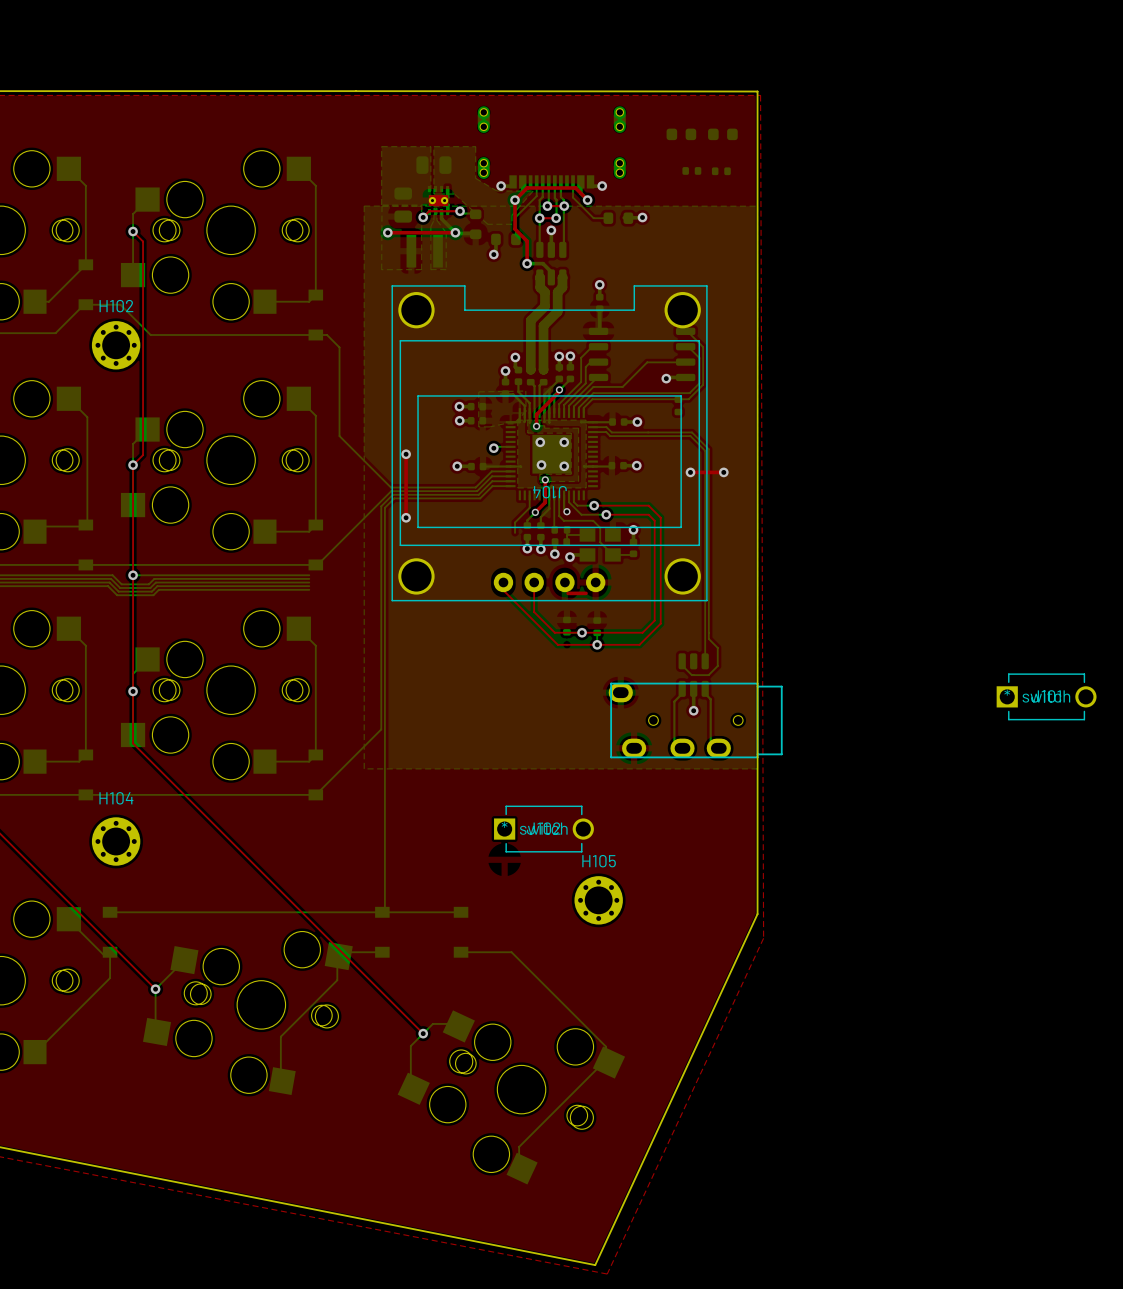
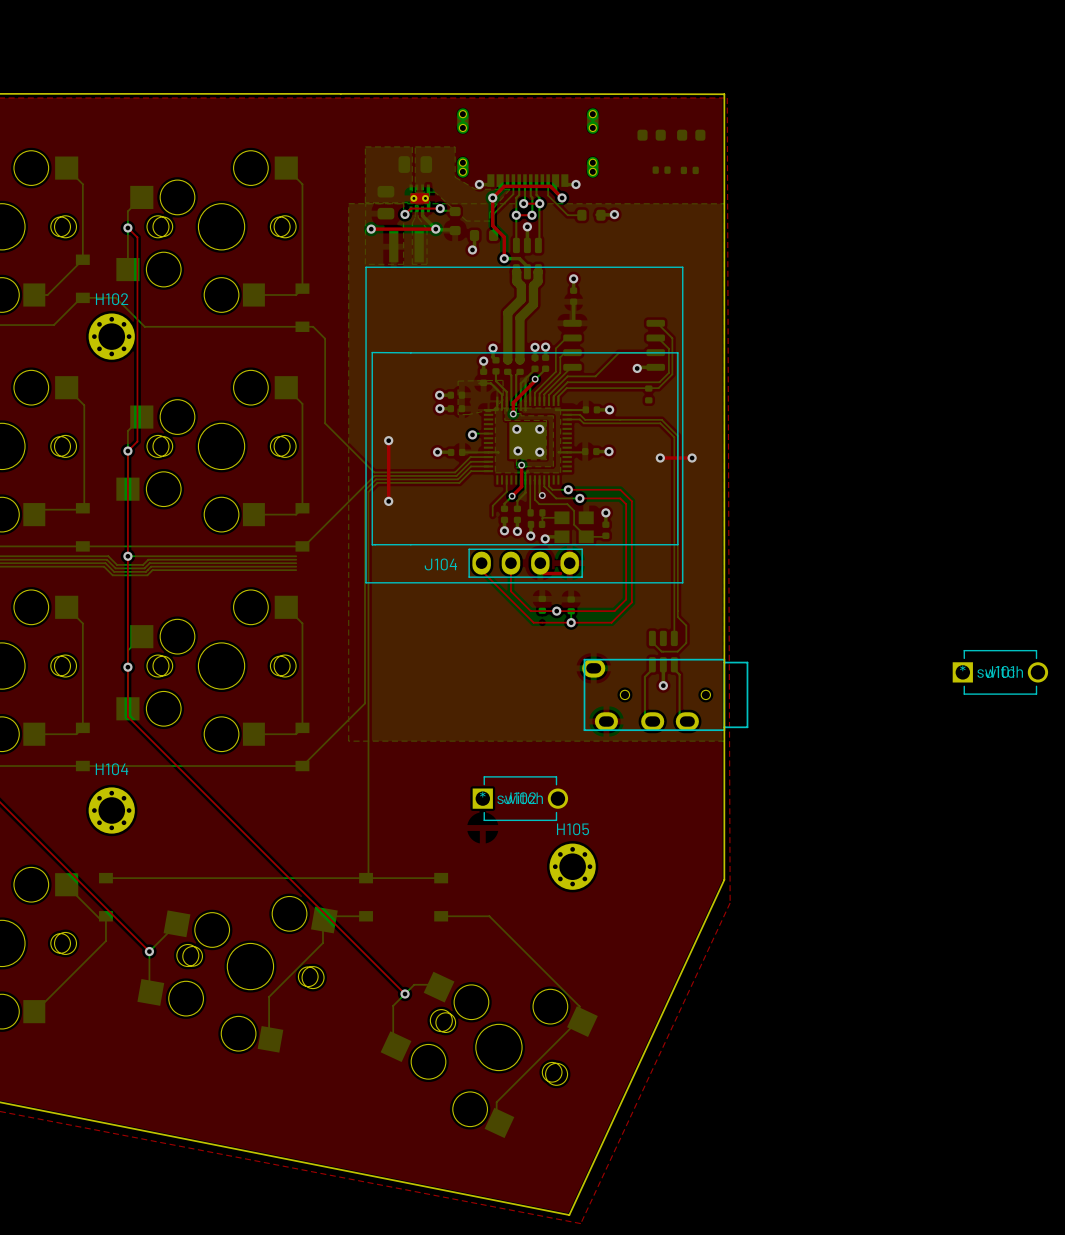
J104 footprint: [391, 285, 708, 602] -> [365, 266, 684, 584]
J104 name position: J104 (549, 492) -> J104 (440, 564)

